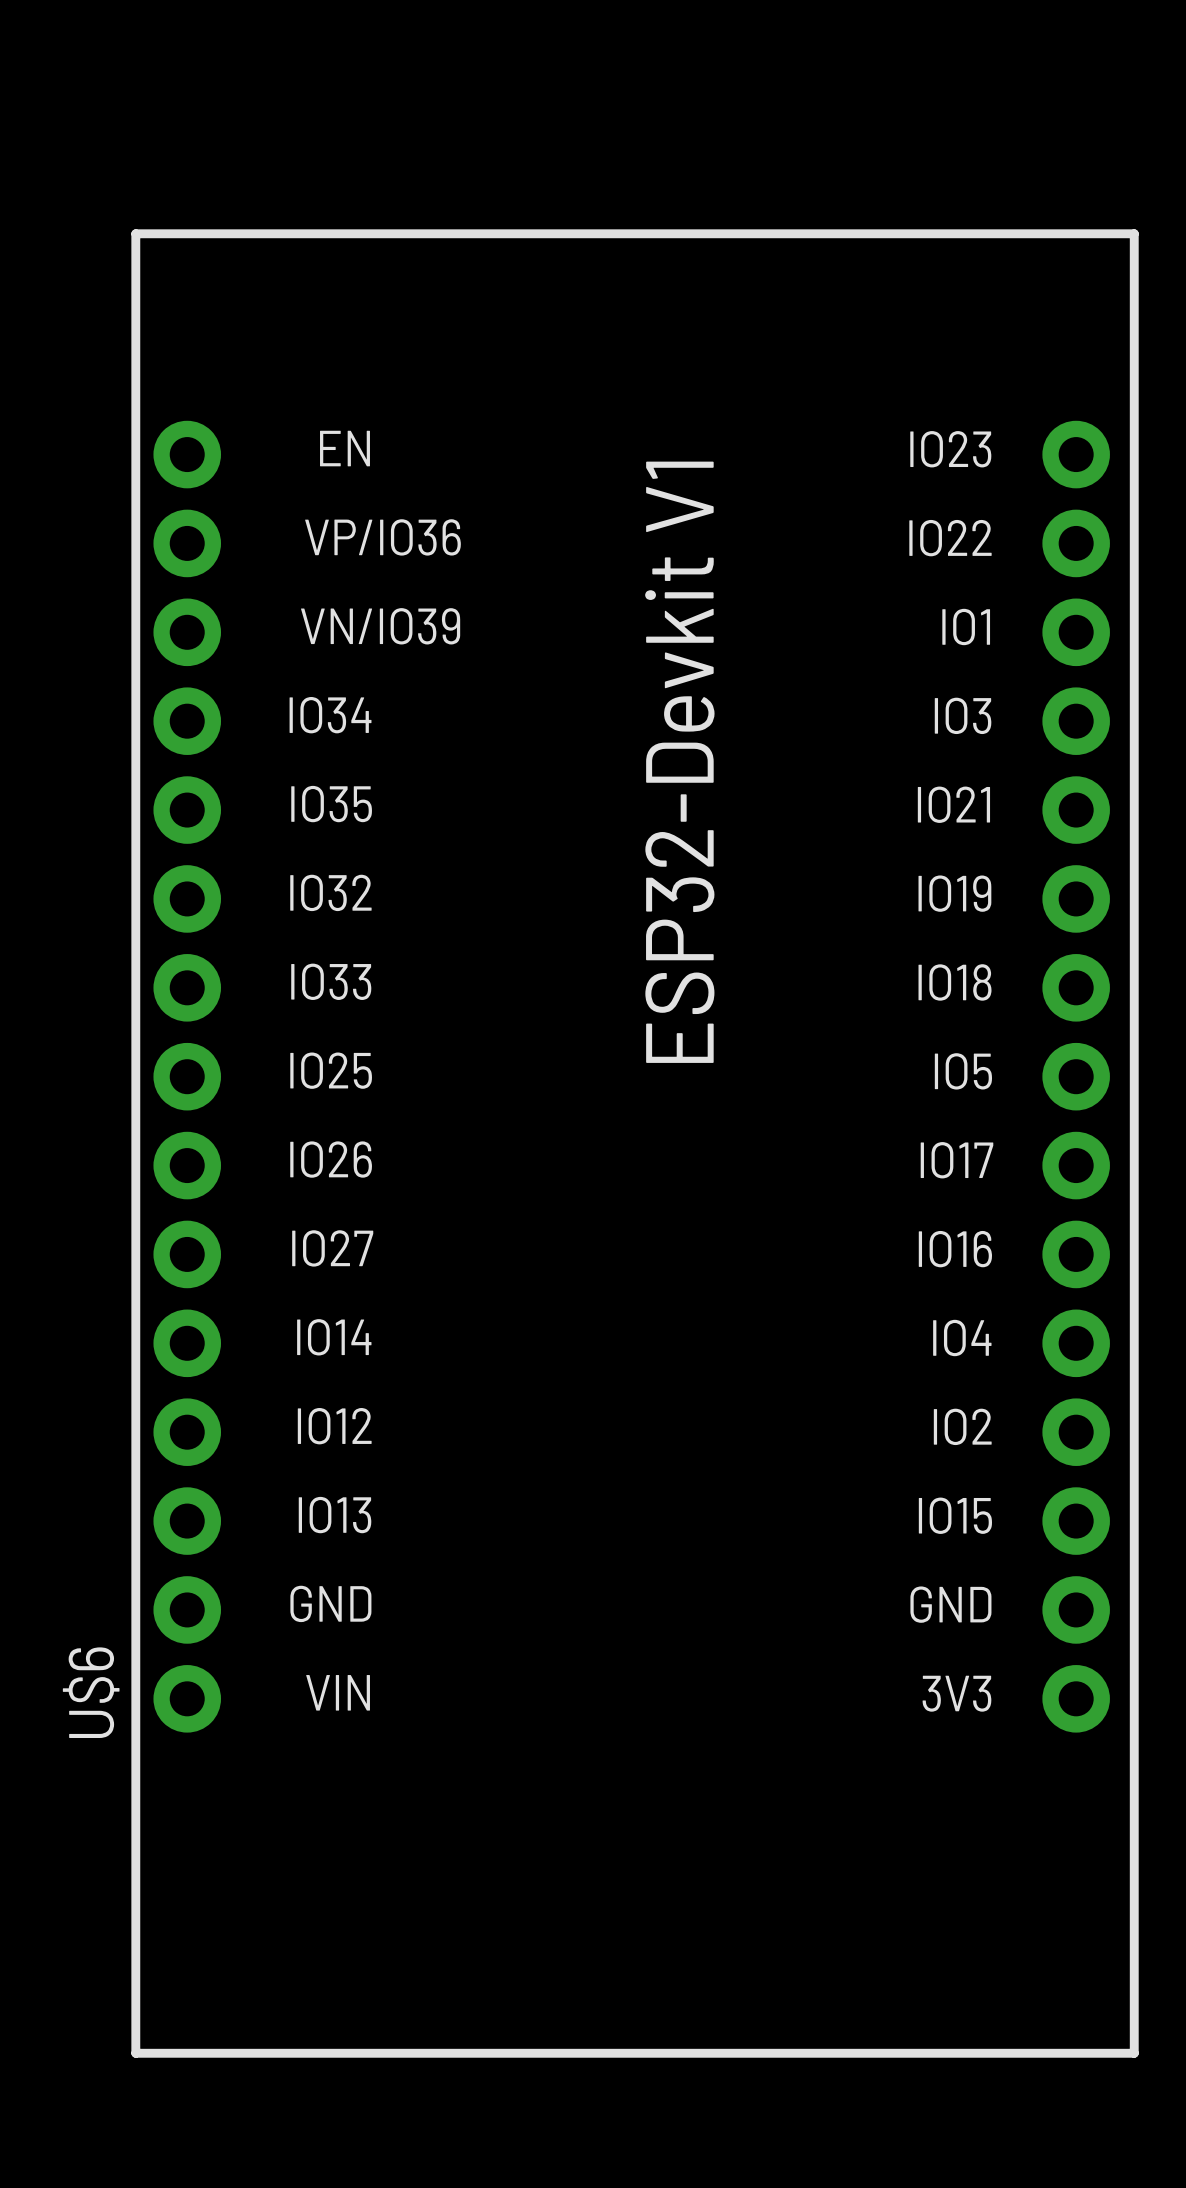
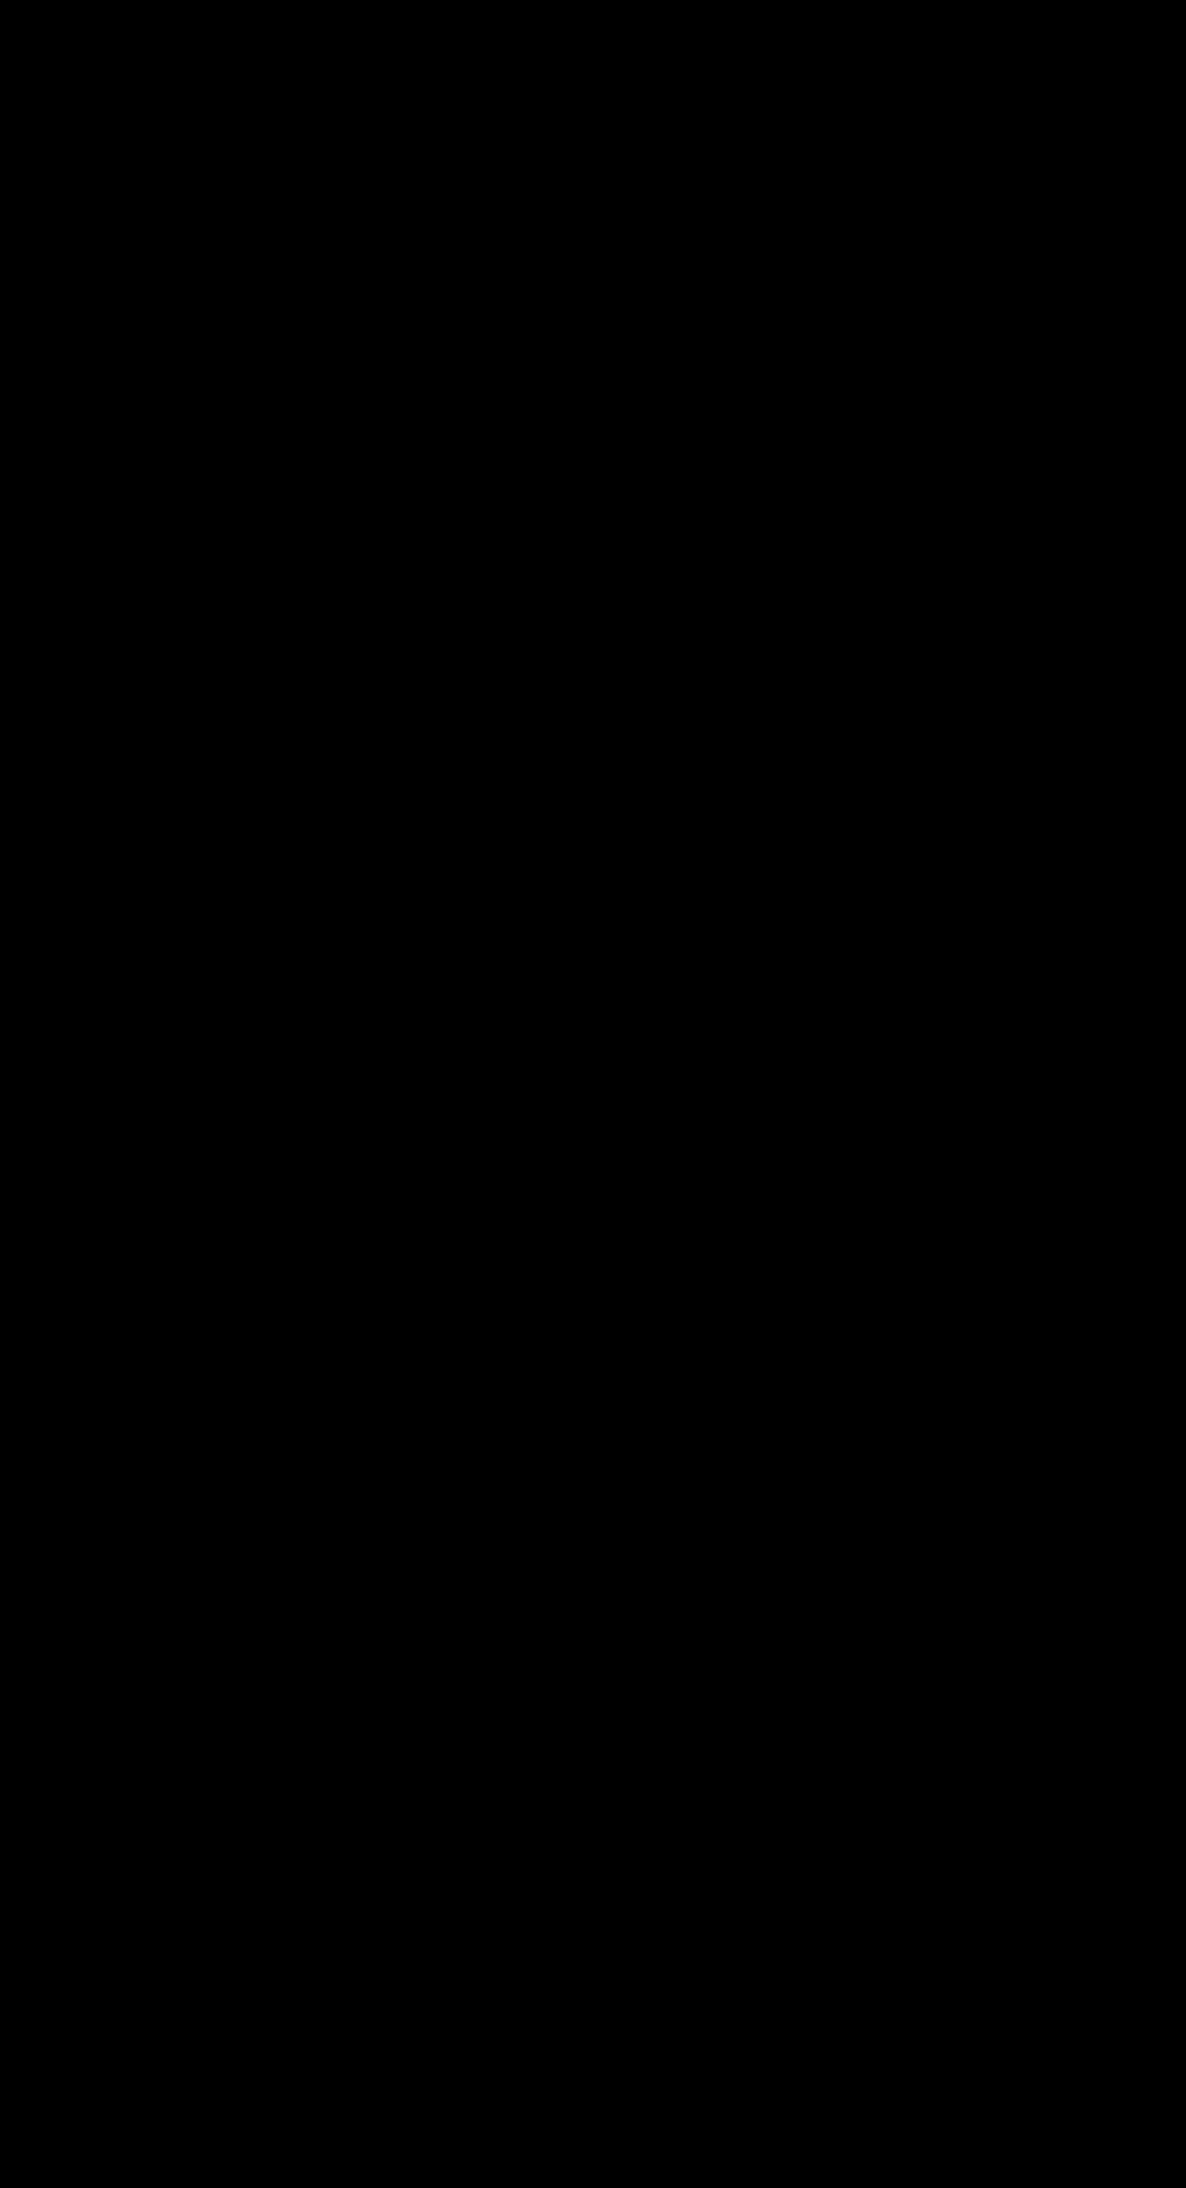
U$6: (635, 1143) -> none

